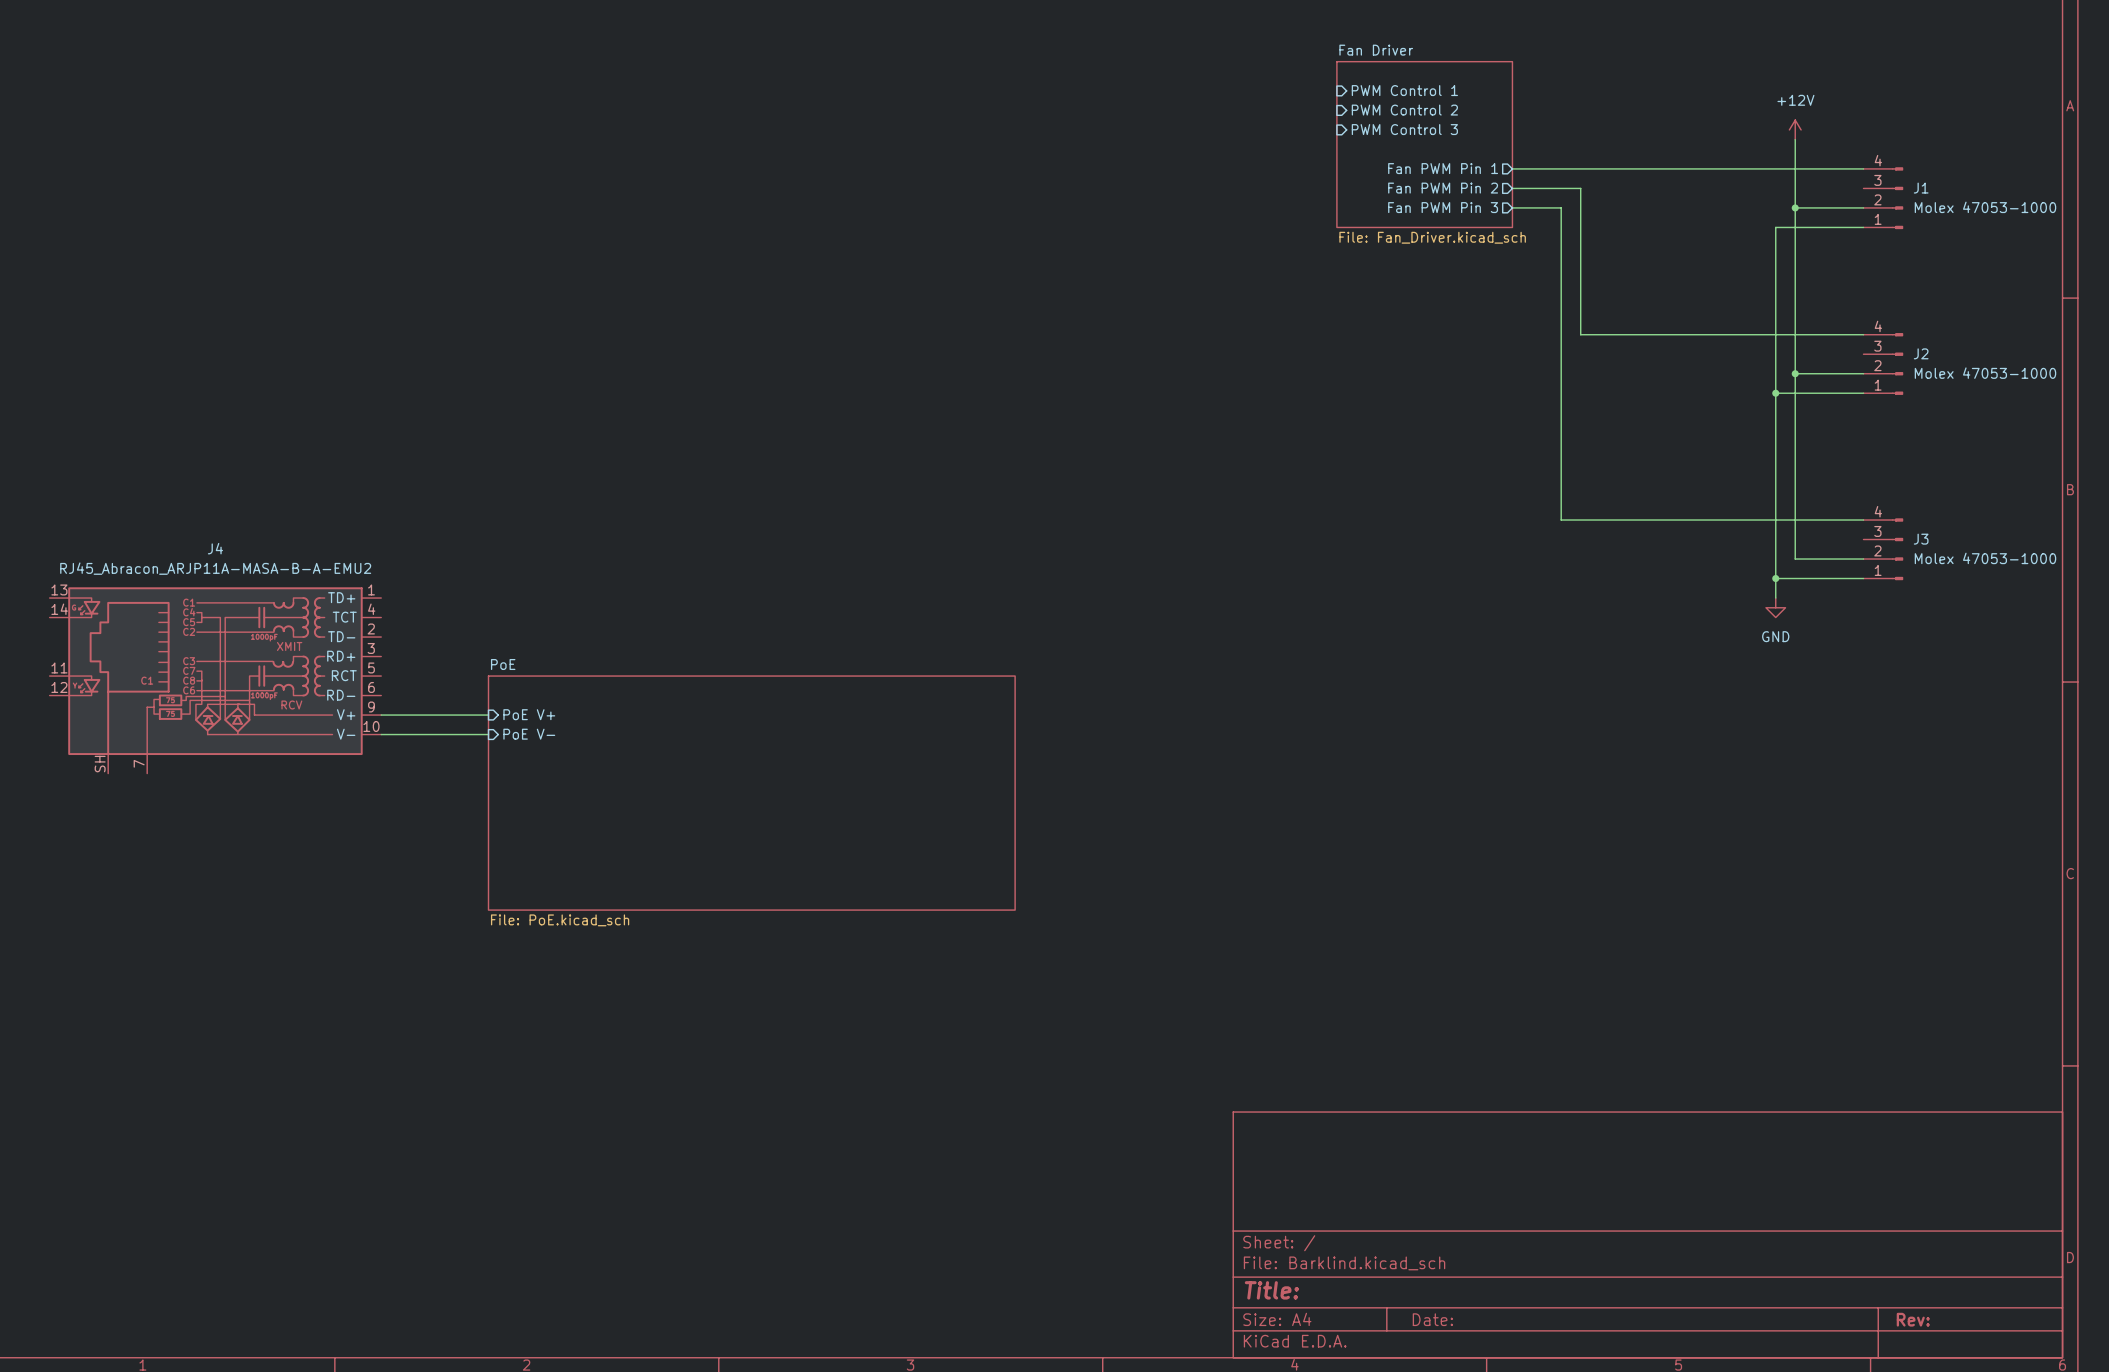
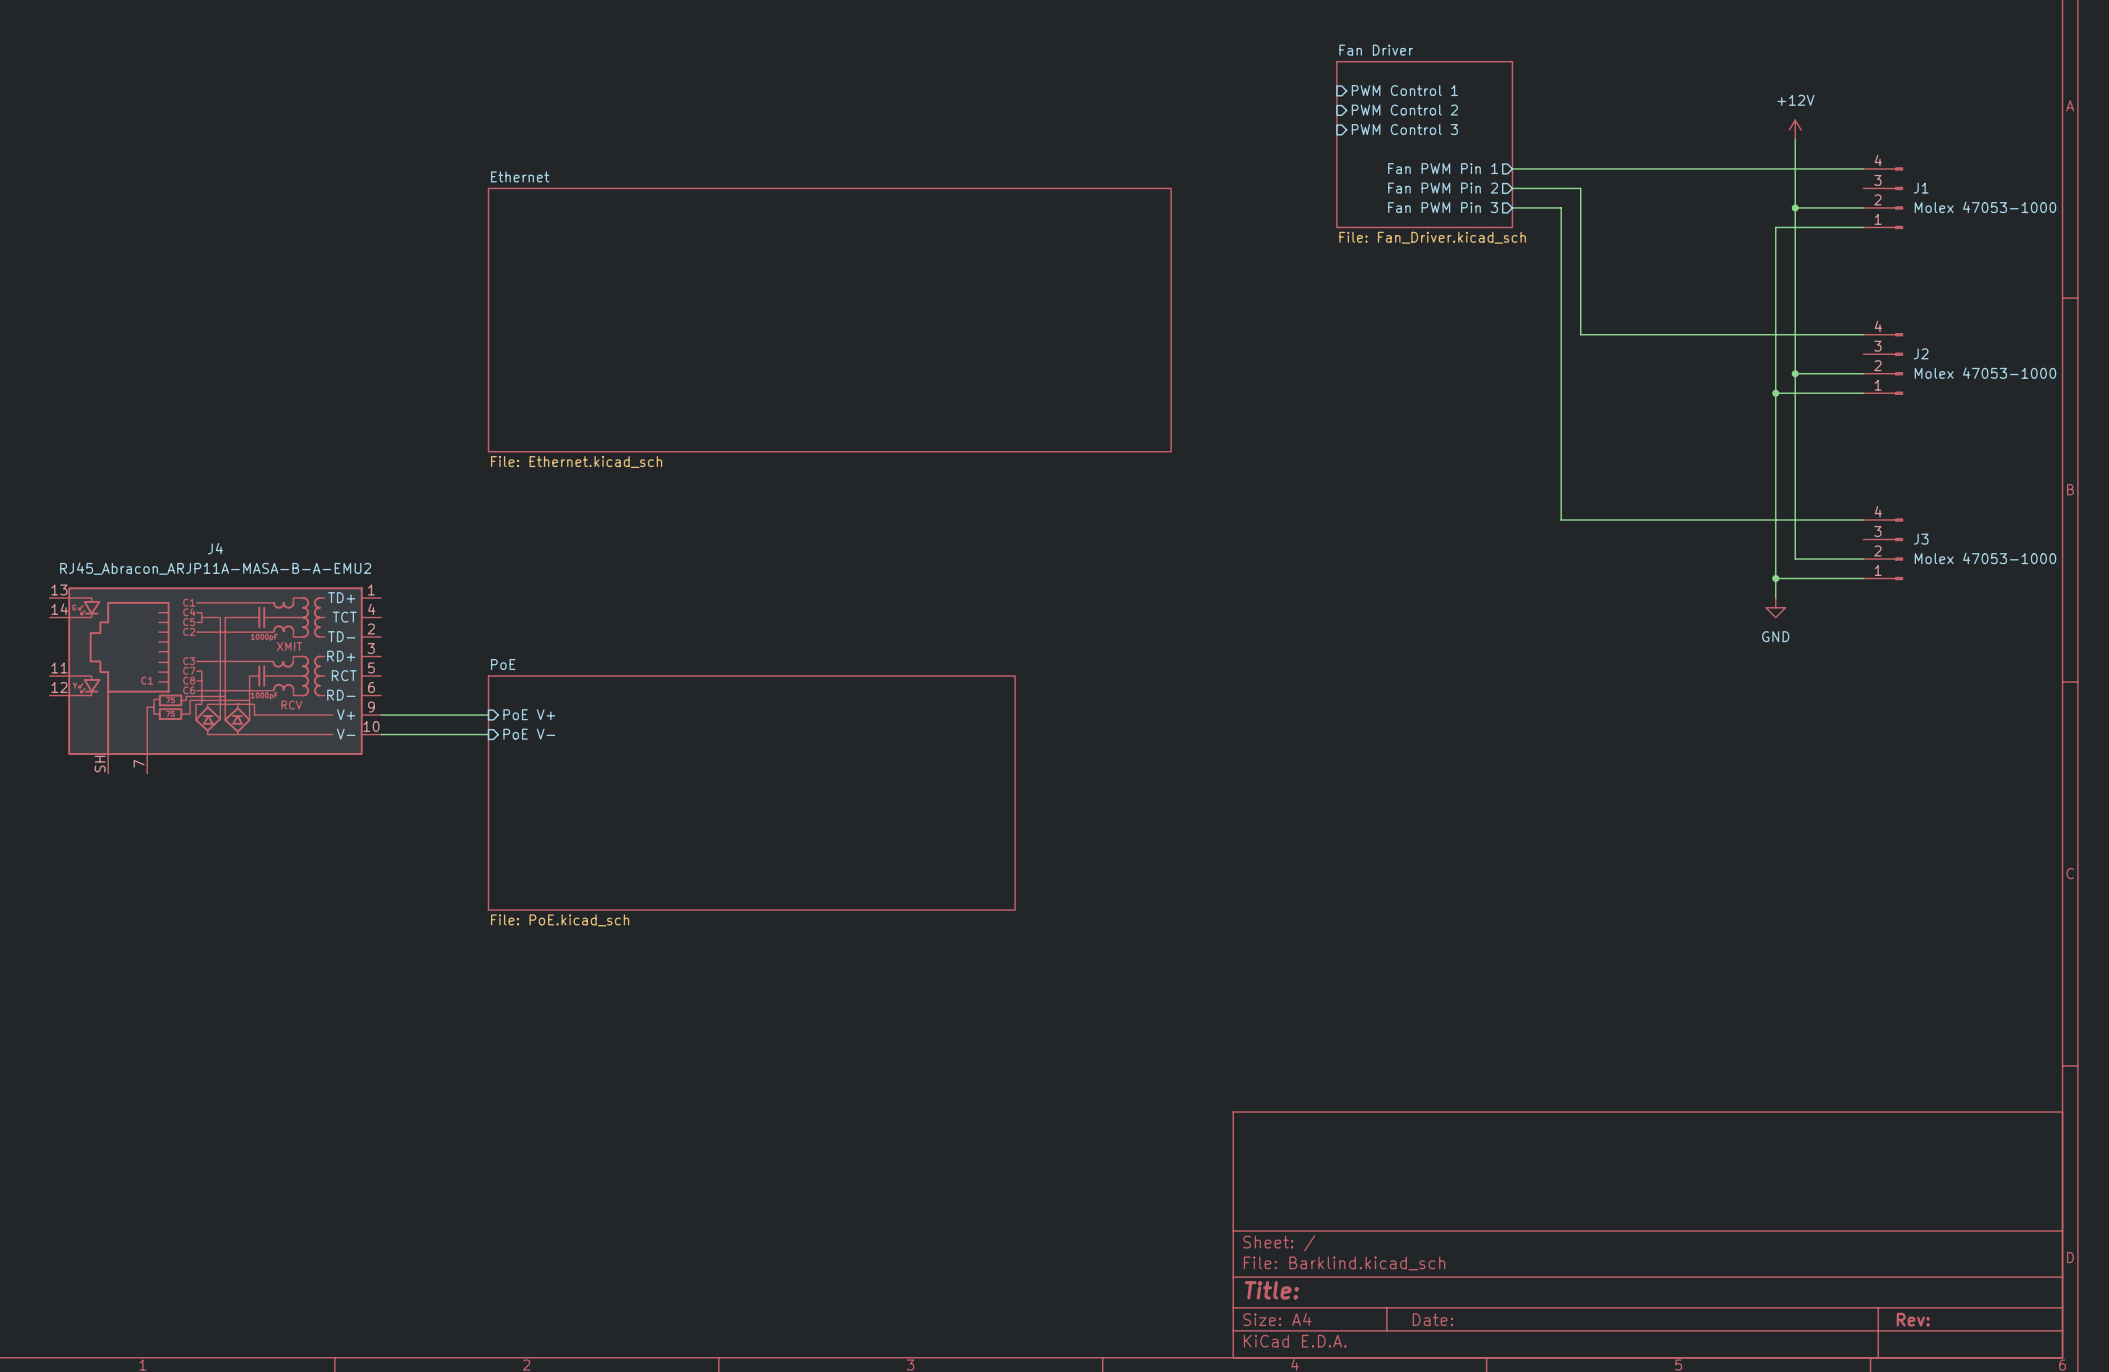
sheet Ethernet: none -> File: Ethernet.kicad_sch (829, 320)

